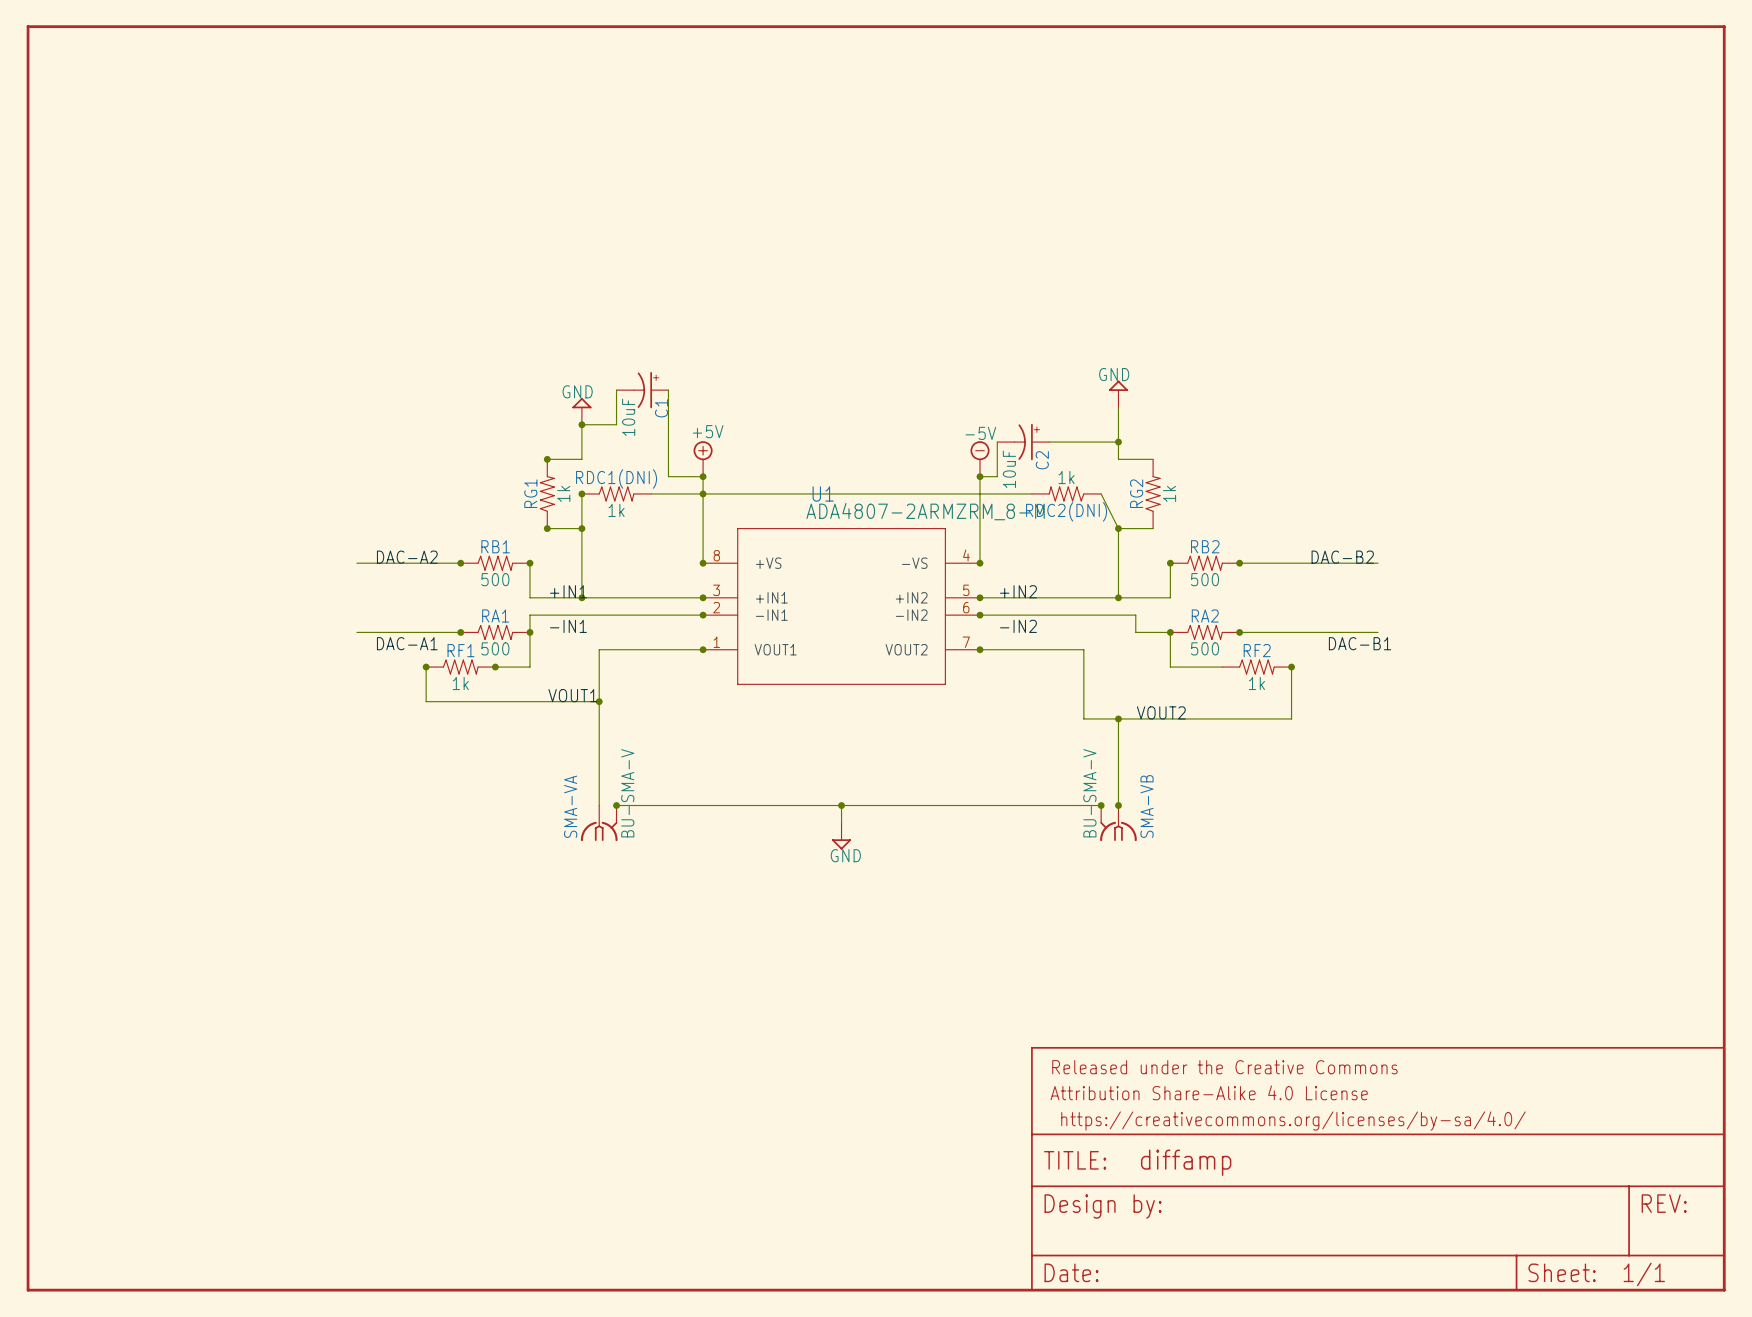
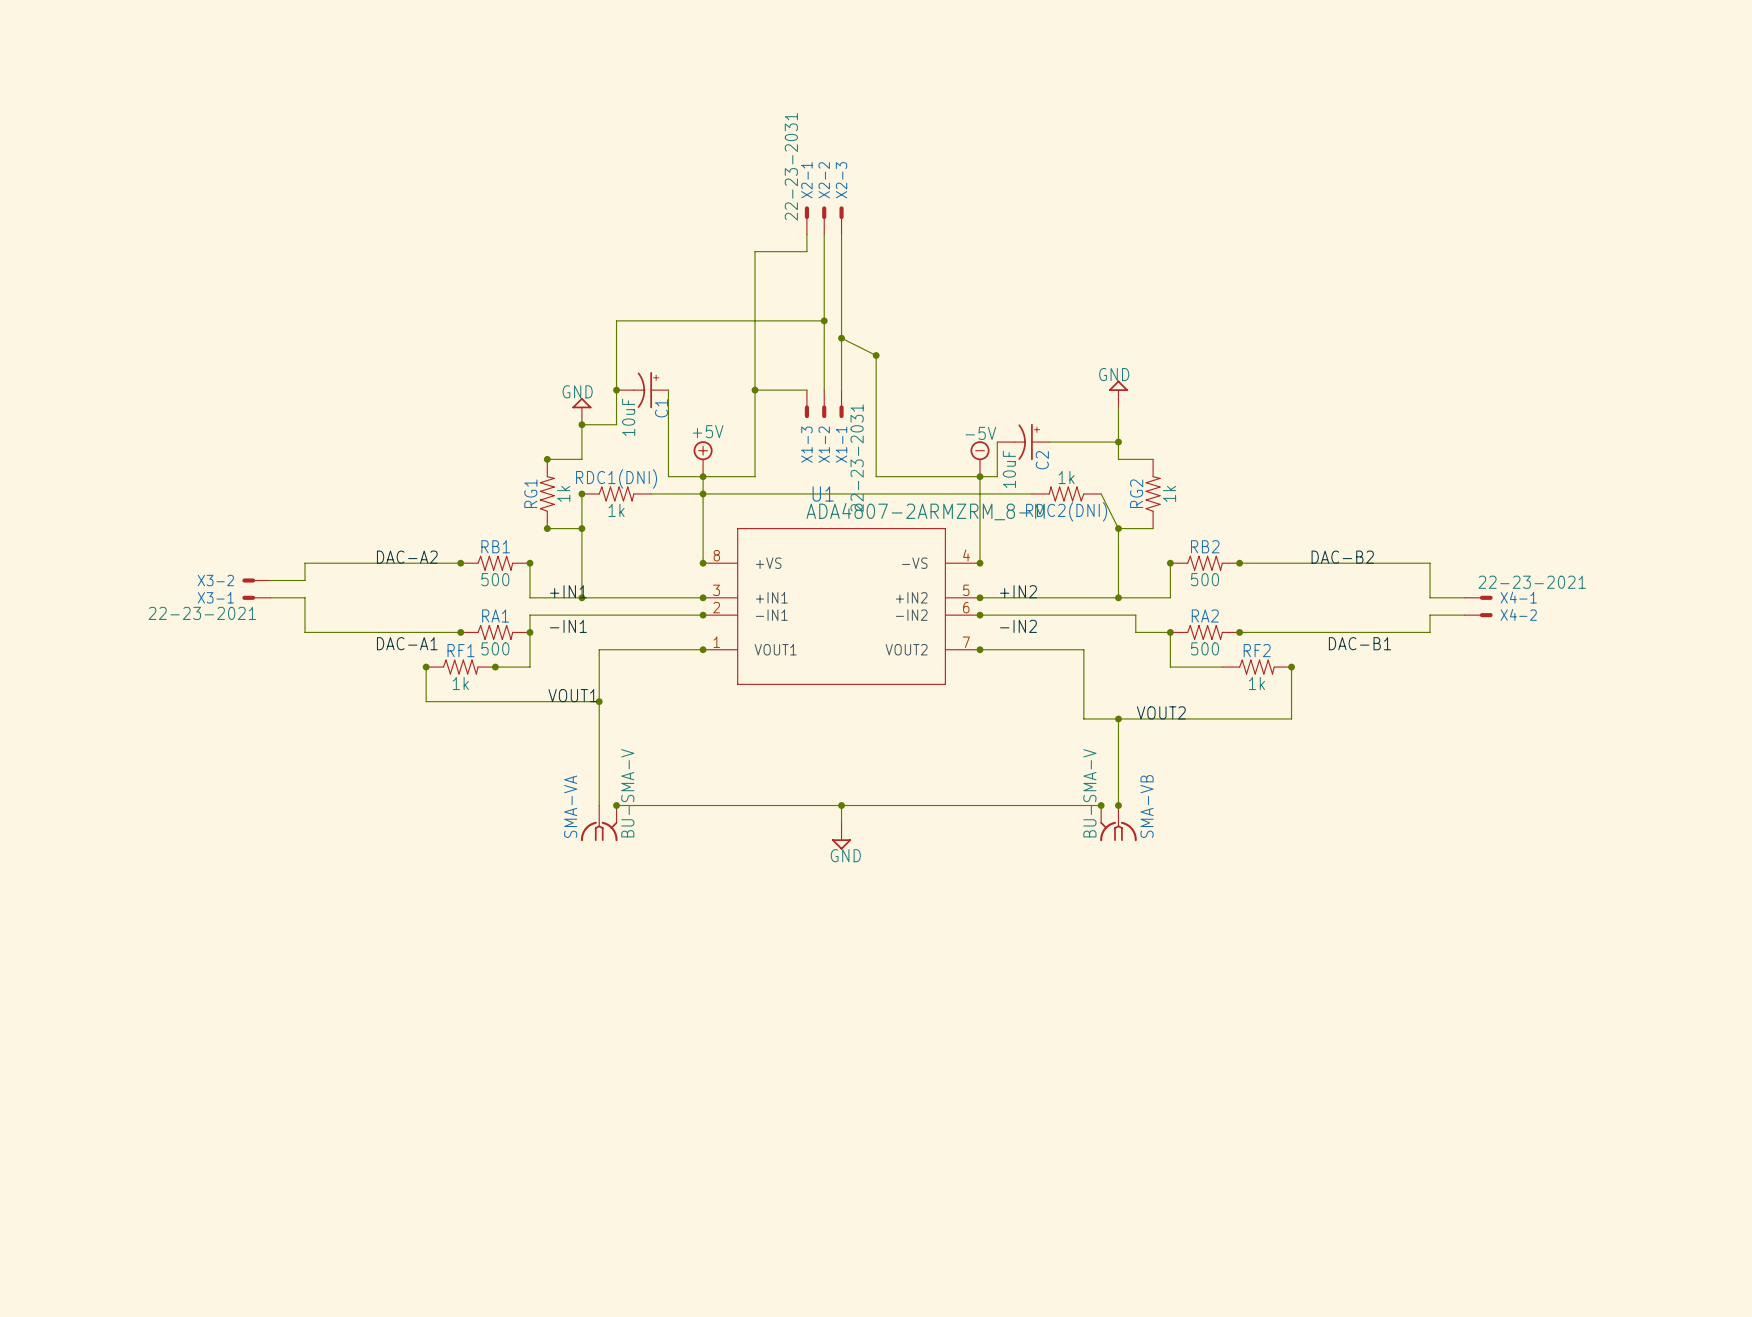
X2-1: none -> 22-23-2031 (806, 220)
X2-2: none -> (824, 220)
X2-3: none -> (841, 220)
wire: none -> (806, 234) (806, 251) (755, 251) (755, 476) (703, 476)
wire: none -> (824, 234) (824, 390)
wire: none -> (841, 234) (841, 390)
wire: none -> (824, 320) (616, 320) (616, 390)
junction: none -> (824, 320)
wire: none -> (841, 338) (876, 355) (876, 476) (980, 476)
junction: none -> (841, 338)
junction: none -> (876, 355)
junction: none -> (616, 390)
wire: none -> (755, 390) (806, 390)
junction: none -> (755, 390)
X1-3: none -> (806, 404)
X1-2: none -> (824, 404)
X1-1: none -> 22-23-2031 (841, 404)
wire: none -> (356, 563) (304, 563) (304, 580) (270, 580)
wire: none -> (1378, 563) (1430, 563) (1430, 597) (1464, 597)
X3-2: none -> (256, 580)
X3-1: none -> 22-23-2021 (256, 597)
wire: none -> (270, 597) (304, 597) (304, 632) (356, 632)
X4-1: none -> 22-23-2021 (1478, 597)
wire: none -> (1464, 615) (1430, 615) (1430, 632) (1378, 632)
X4-2: none -> (1478, 615)
part: (876, 658) -> none
part: (1378, 1168) -> none

